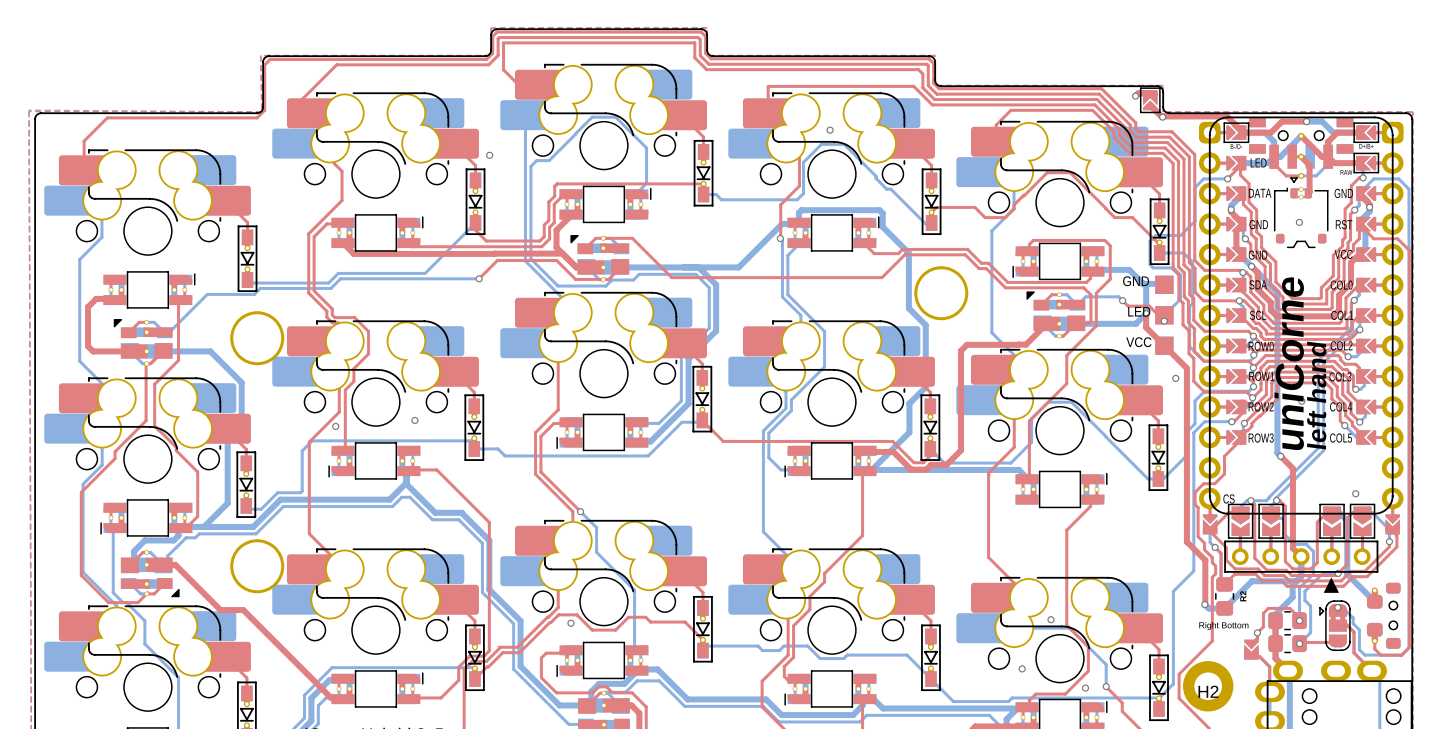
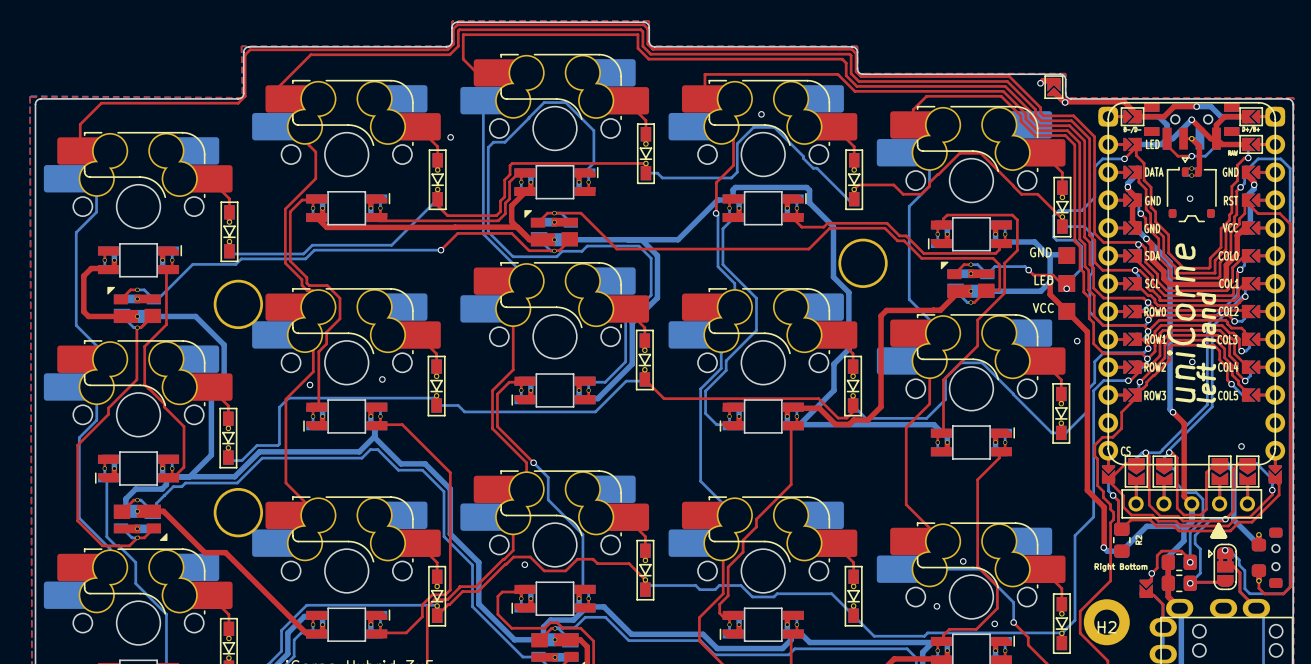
part footprint: [1249, 117, 1354, 179] -> [1144, 102, 1240, 150]
via: none -> (1191, 119)
via: none -> (1191, 156)

